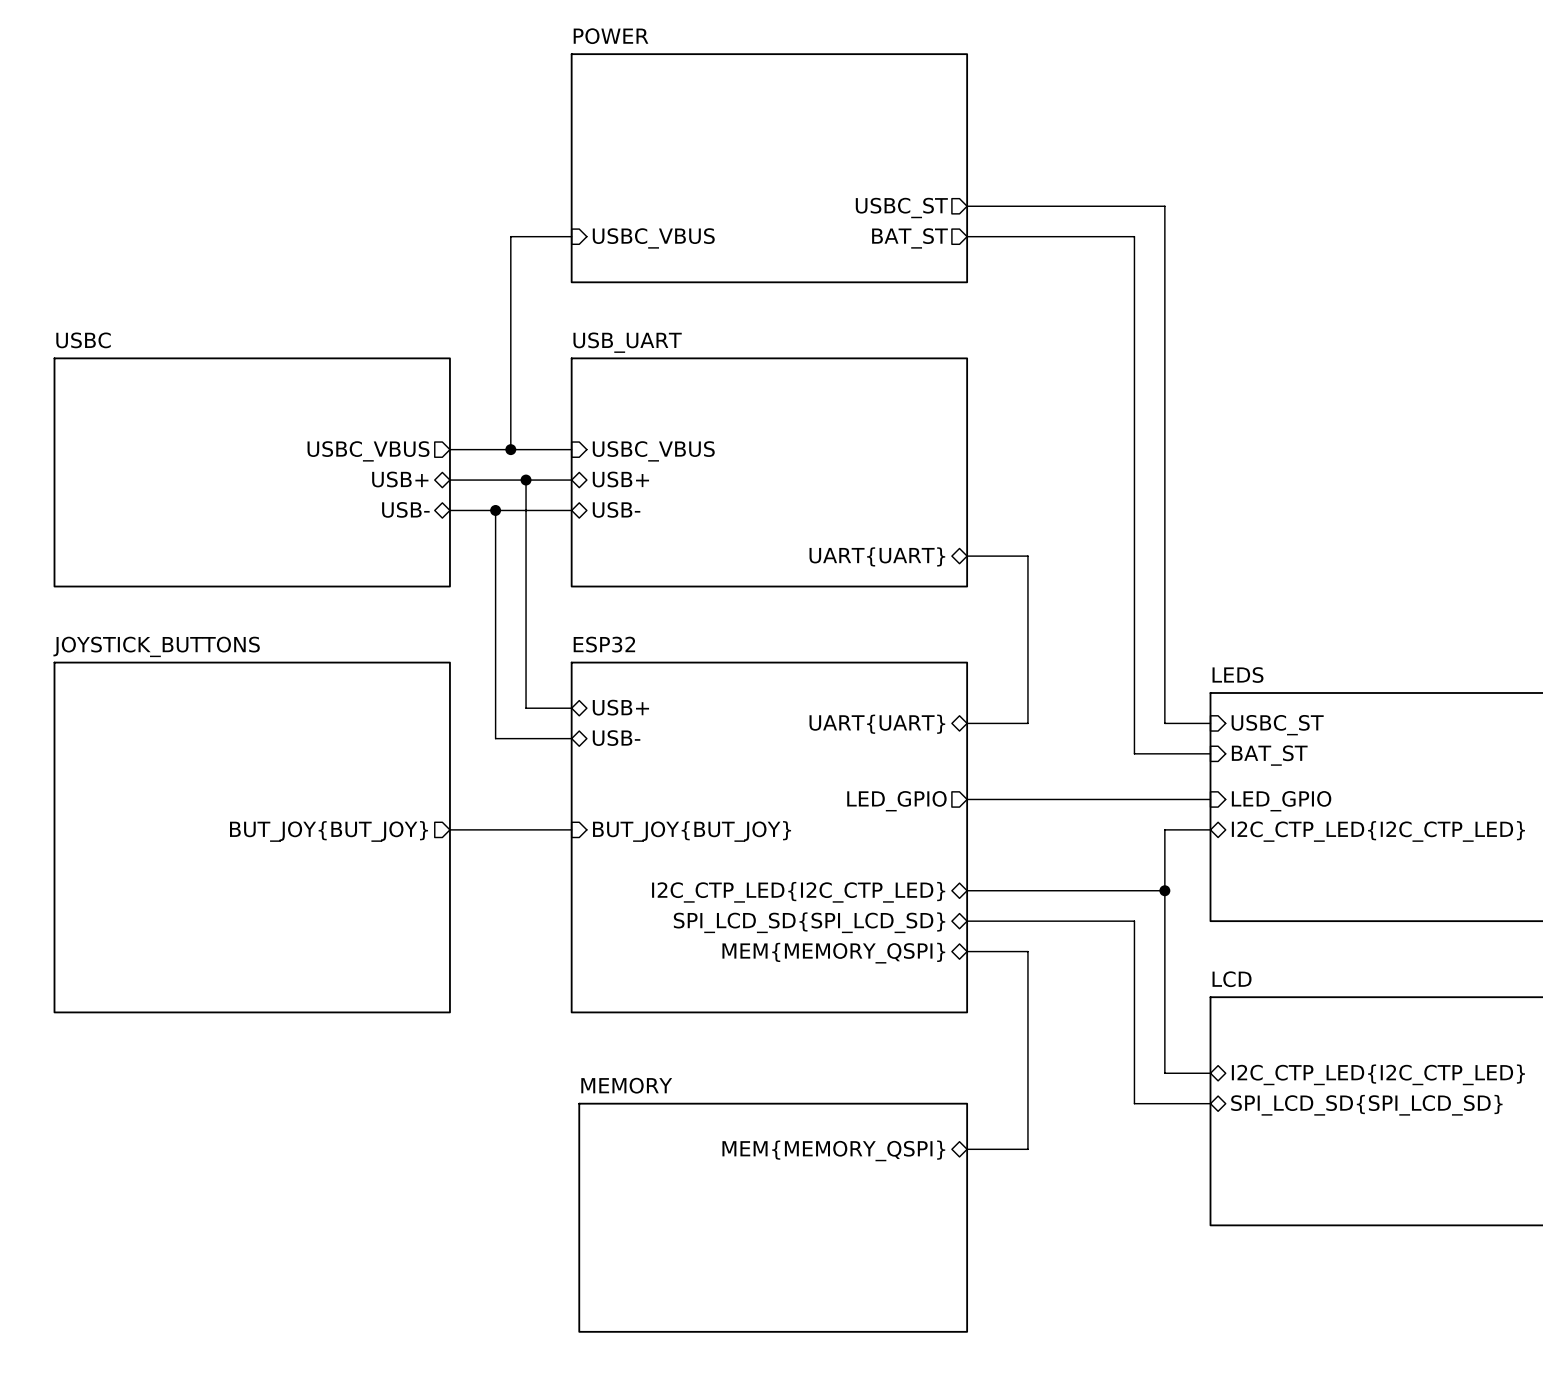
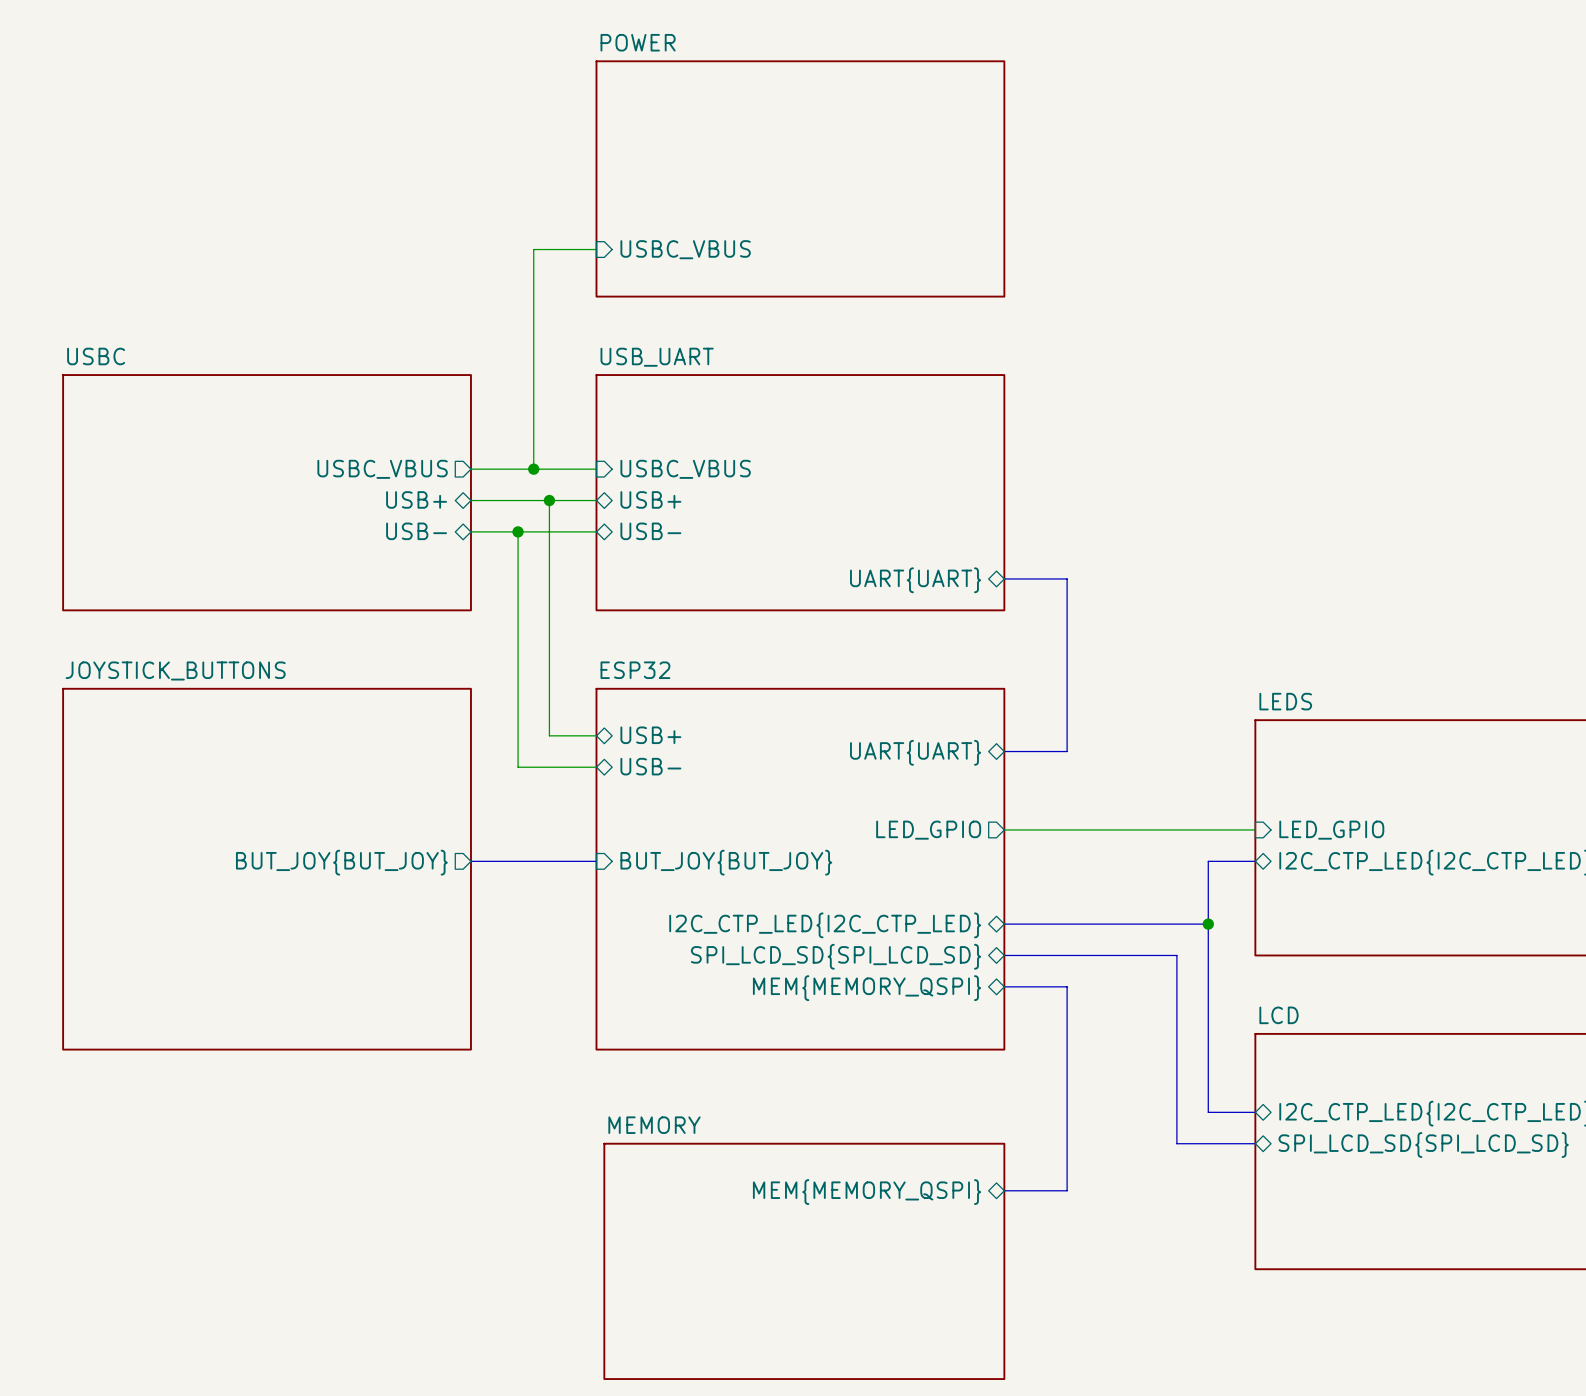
wire: (967, 206) (1164, 206) (1164, 723) (1210, 723) -> none
sheet pin: USBC_ST (901, 208) -> none
wire: (967, 236) (1134, 236) (1134, 753) (1210, 753) -> none
sheet pin: BAT_ST (909, 238) -> none
sheet pin: USBC_ST (1277, 725) -> none
sheet pin: BAT_ST (1269, 755) -> none

